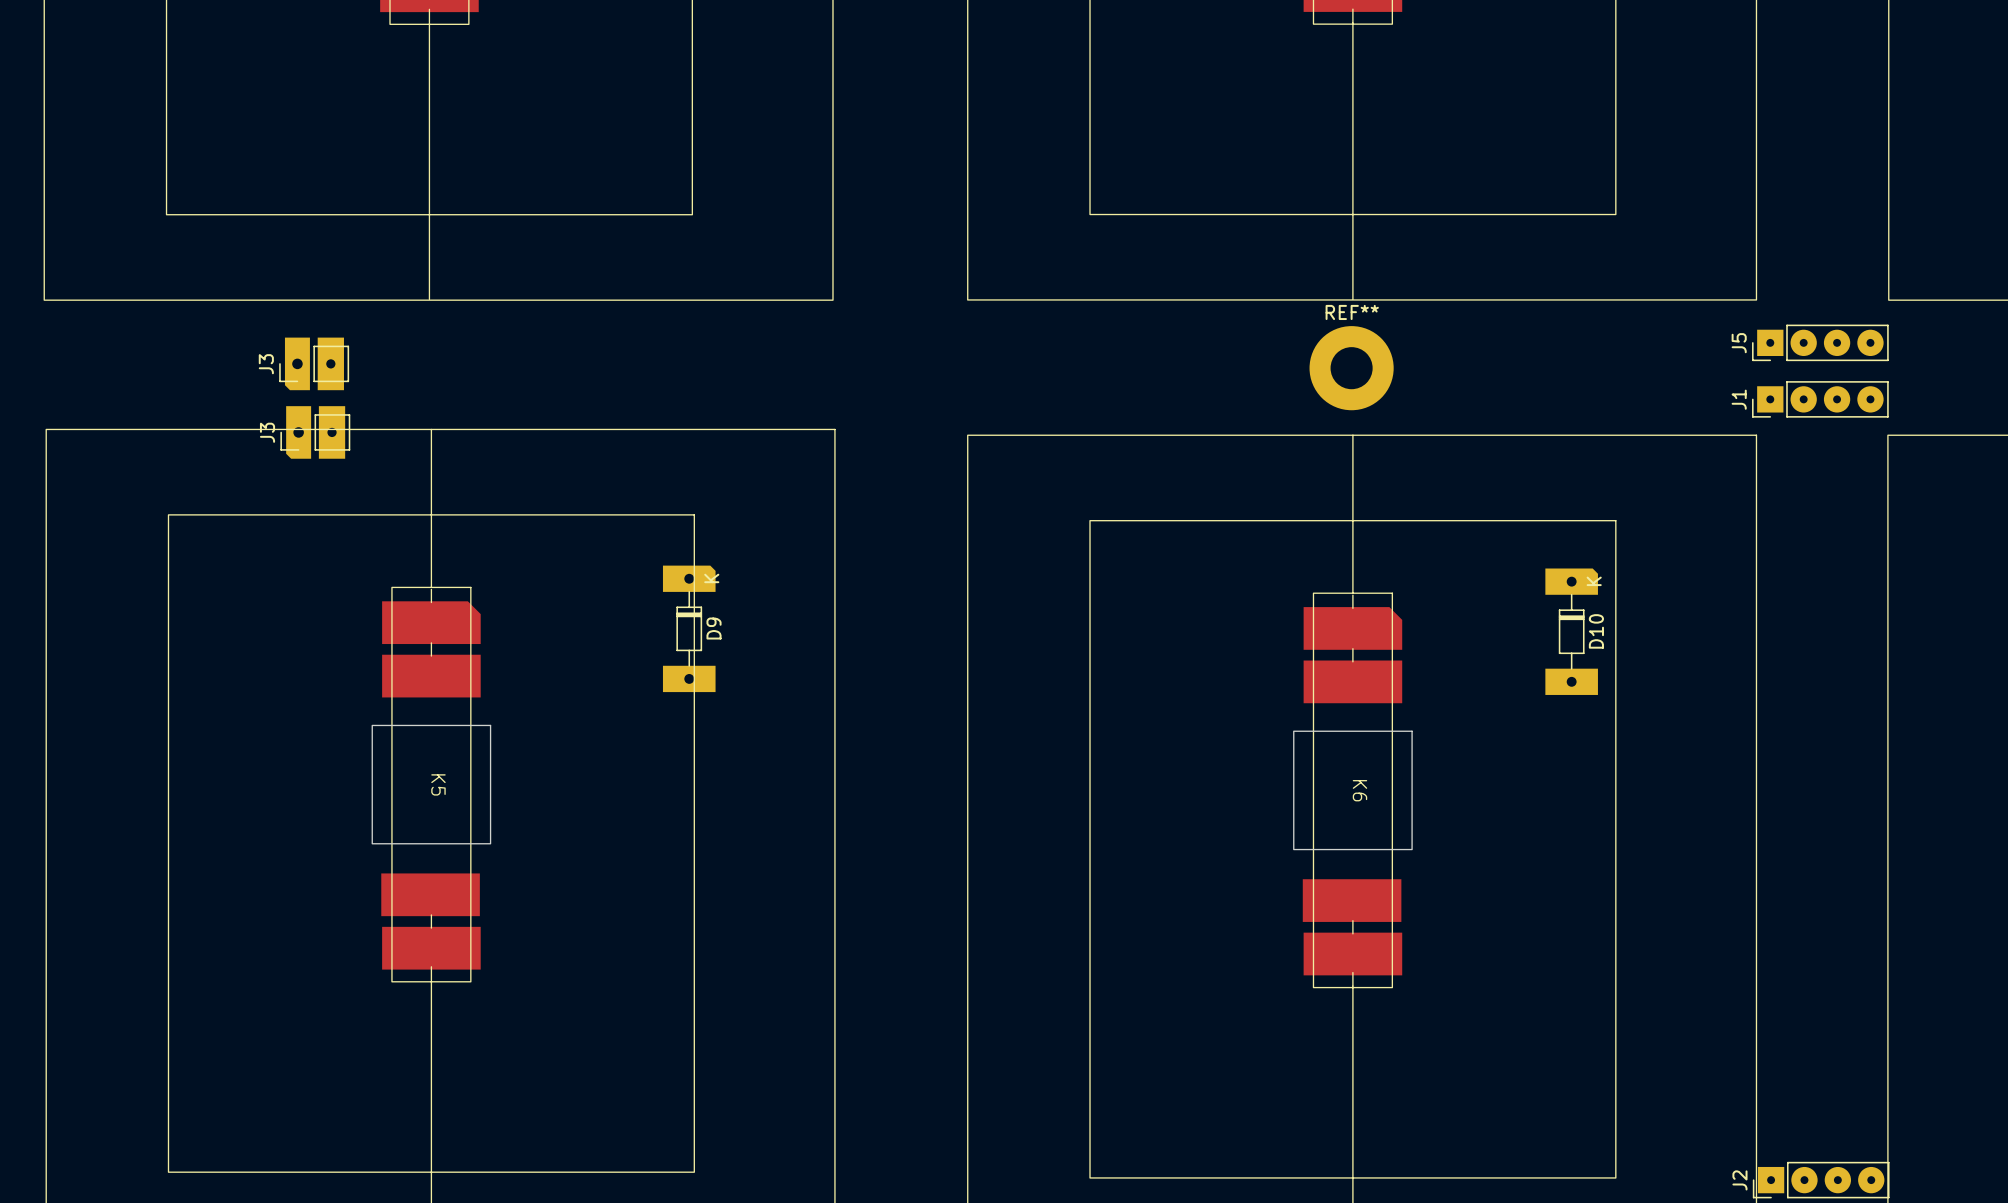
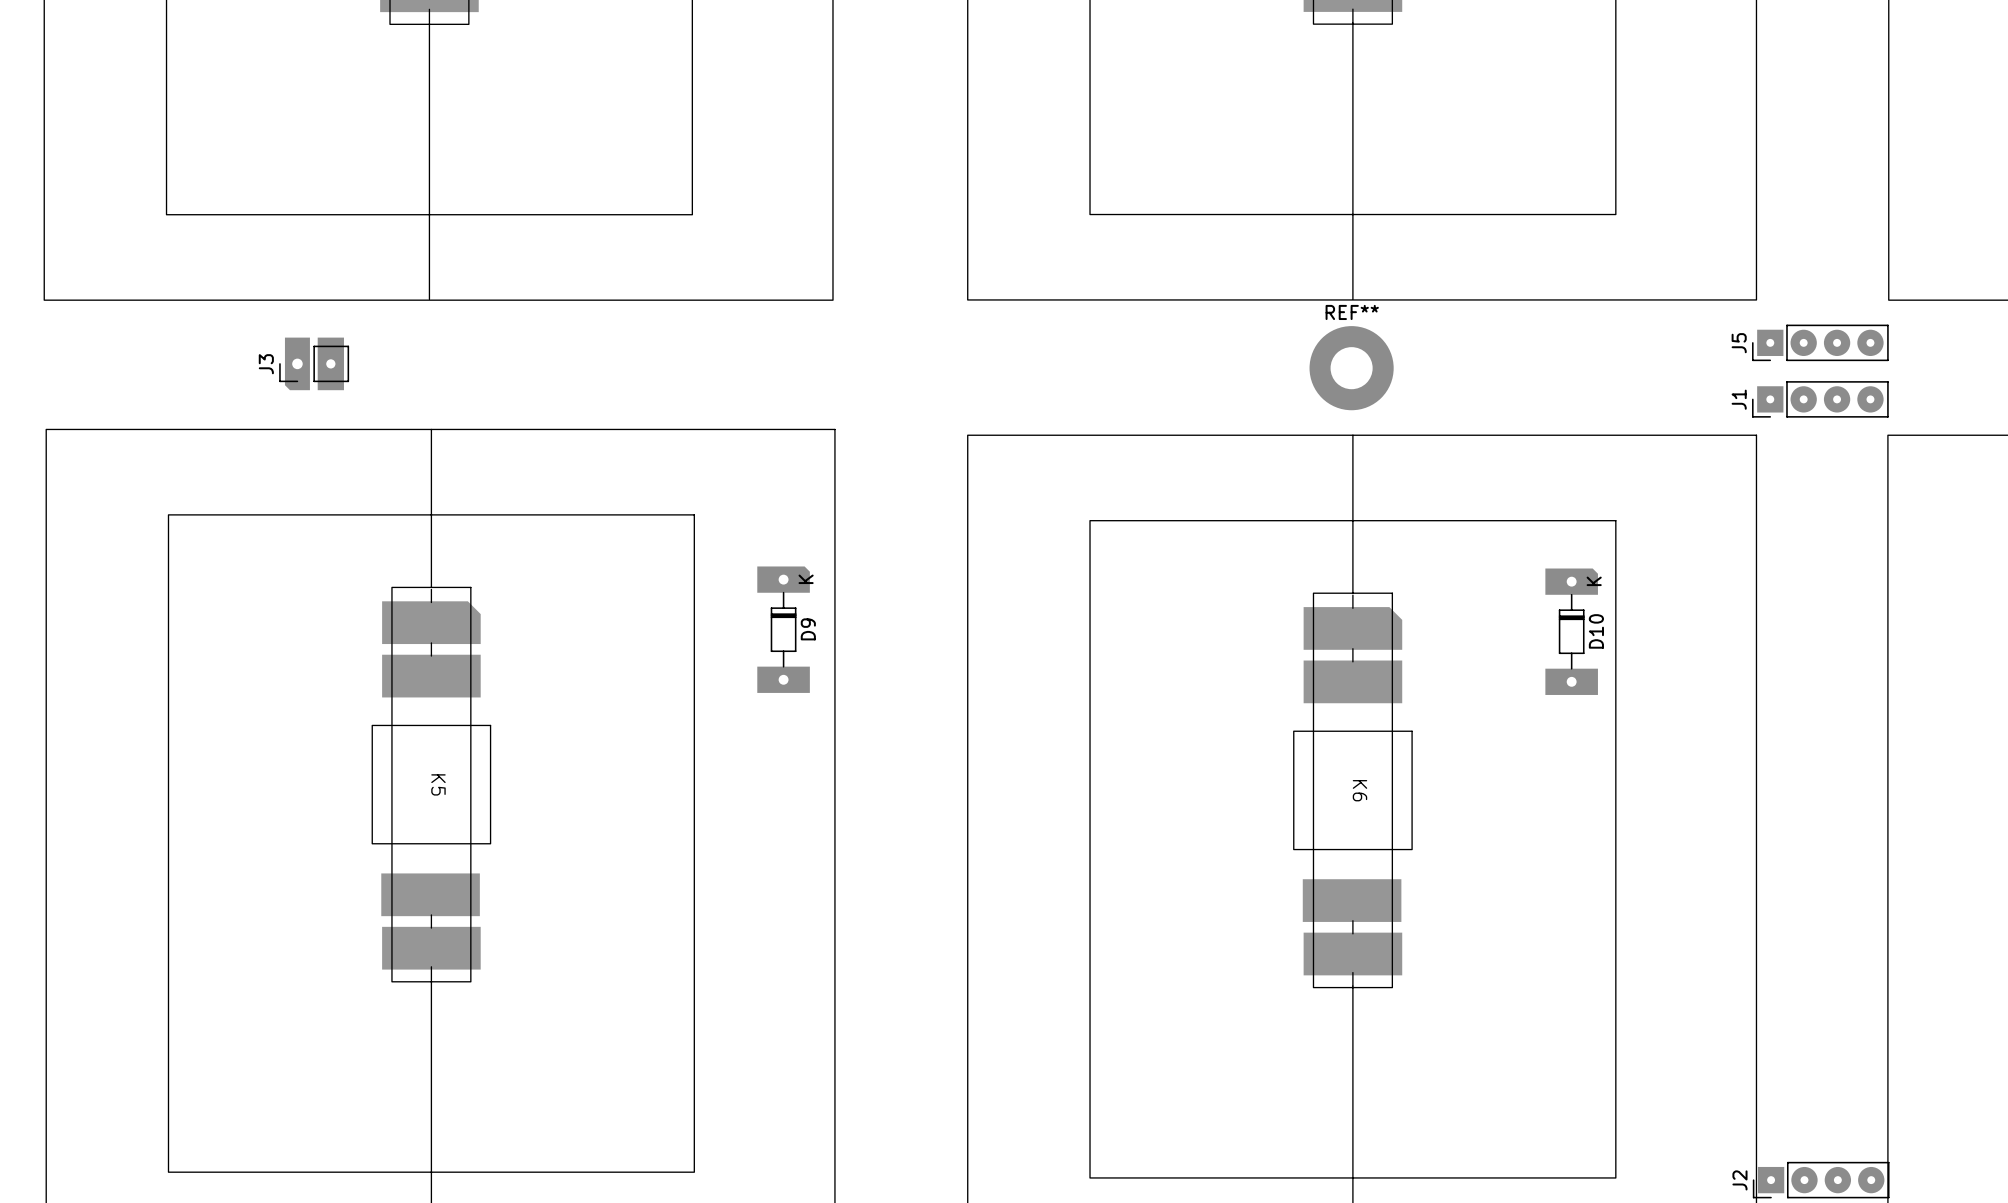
J3: (315, 432) -> none
D9 position: (689, 628) -> (783, 629)

